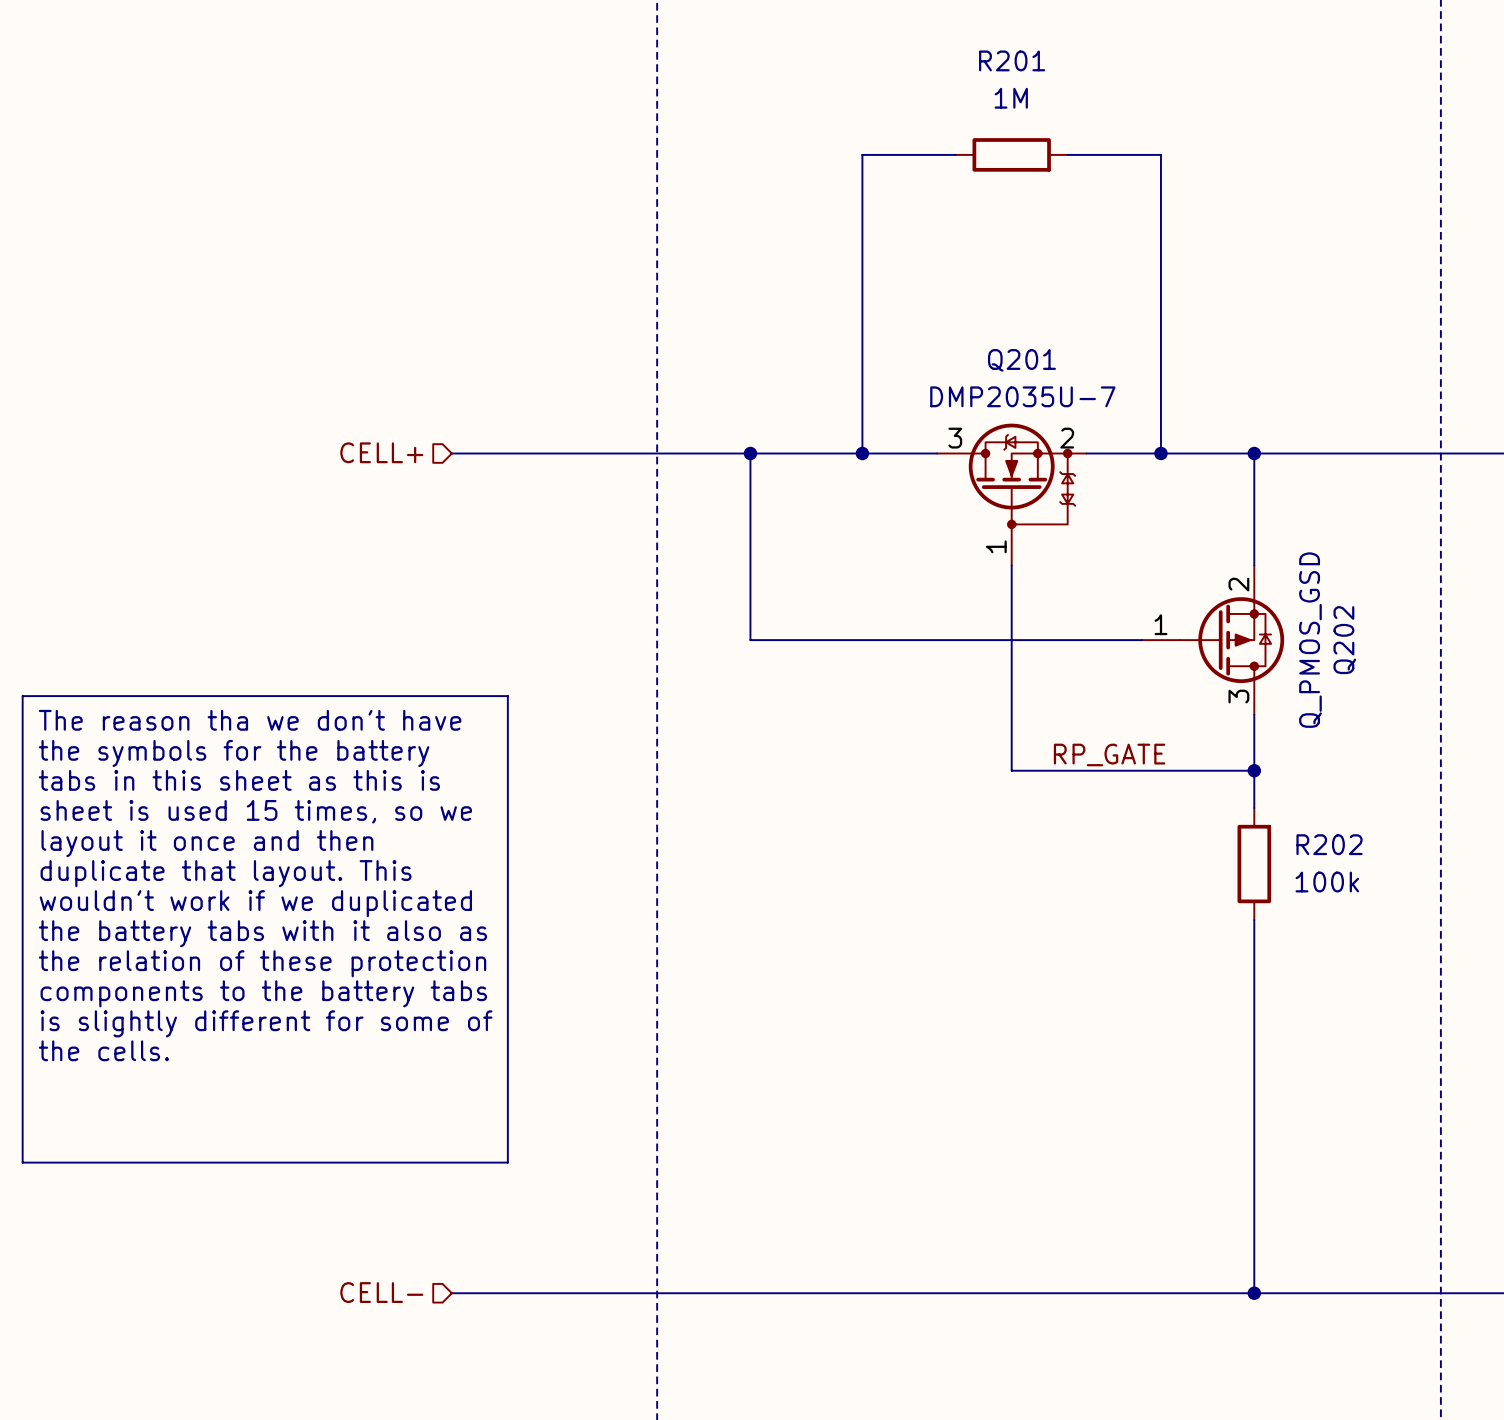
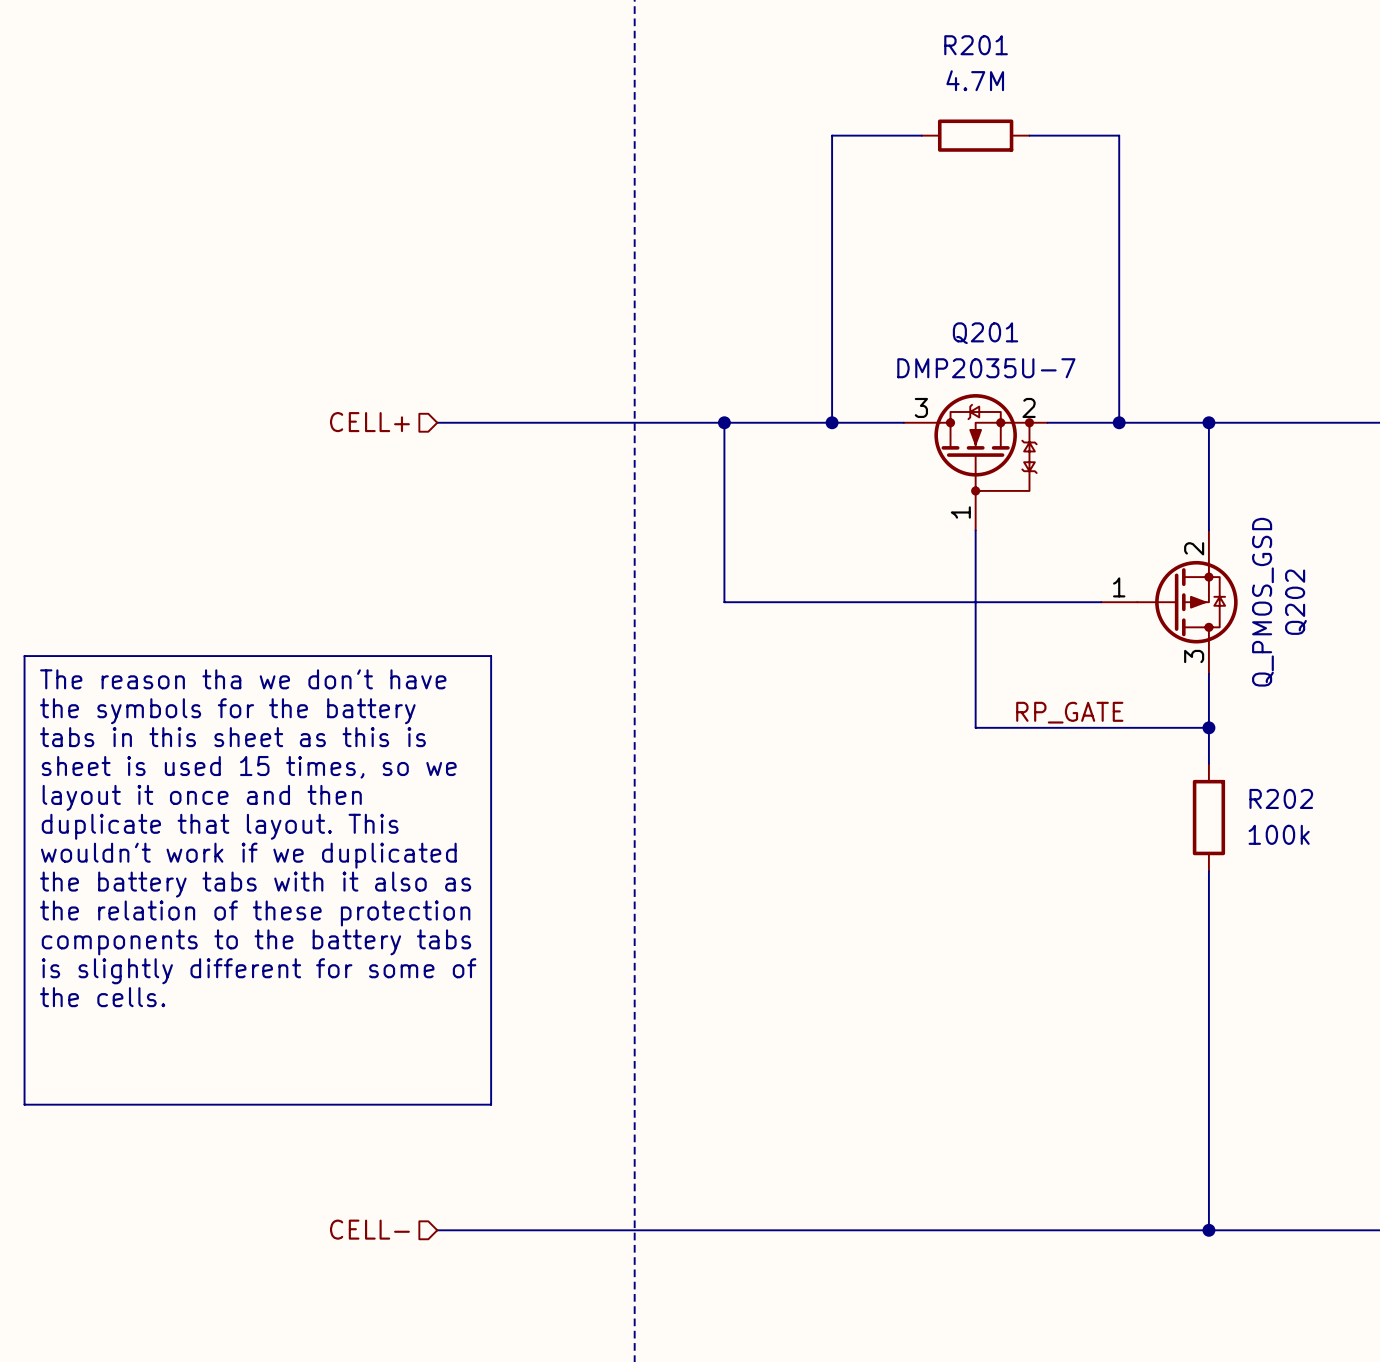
R201 value: 1M (1011, 98) -> 4.7M (975, 80)

